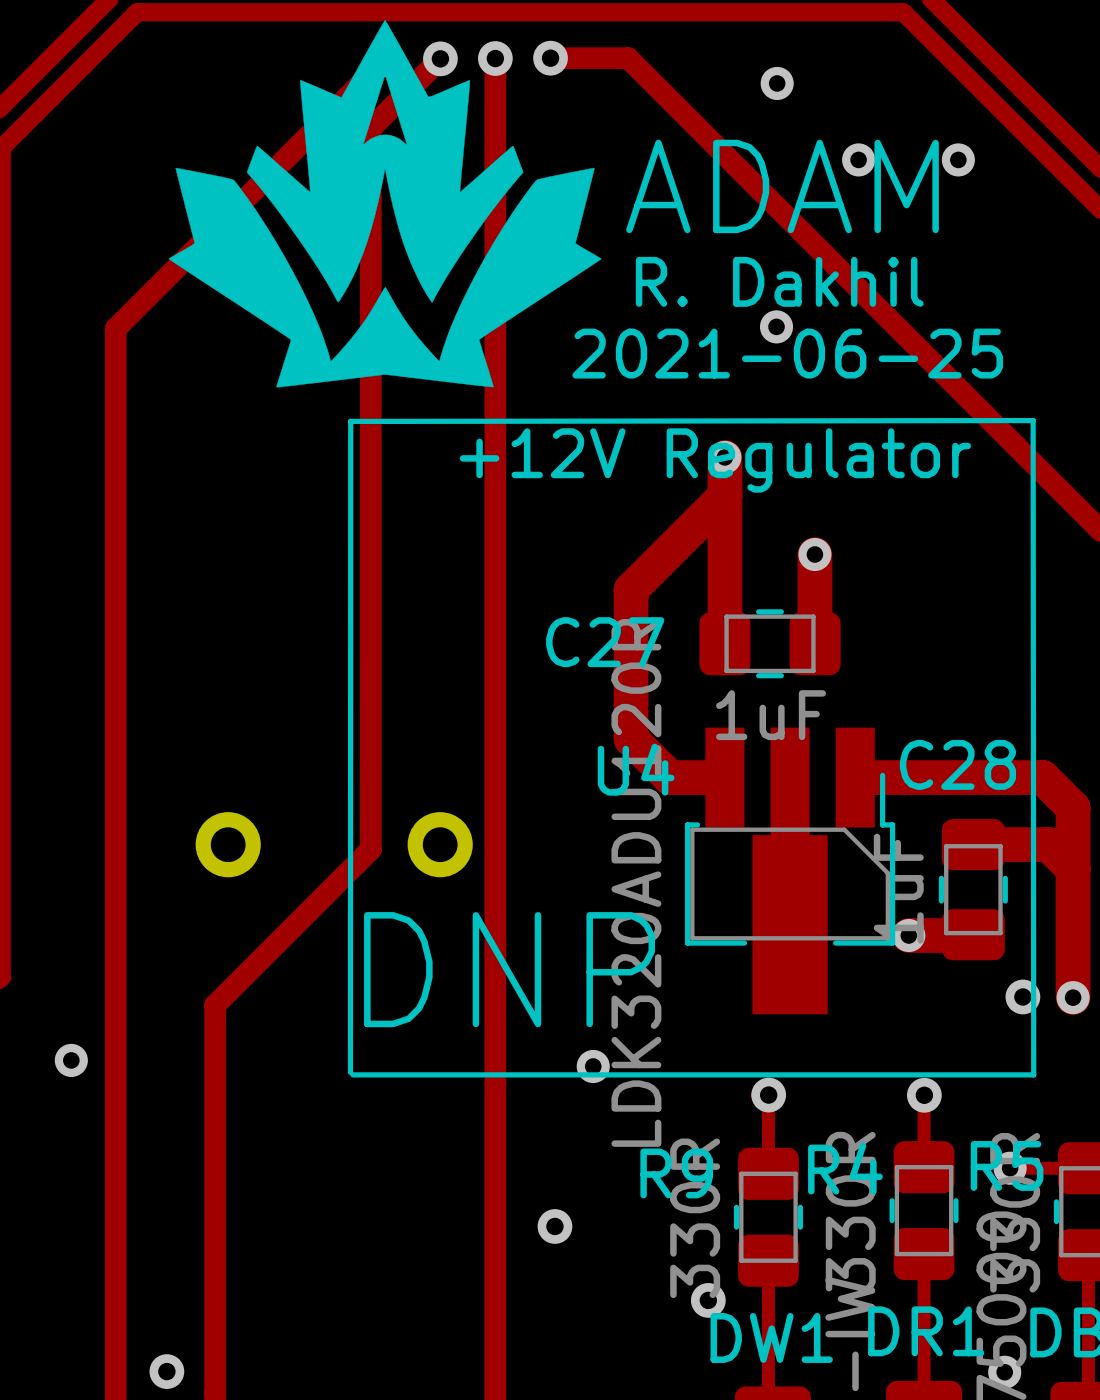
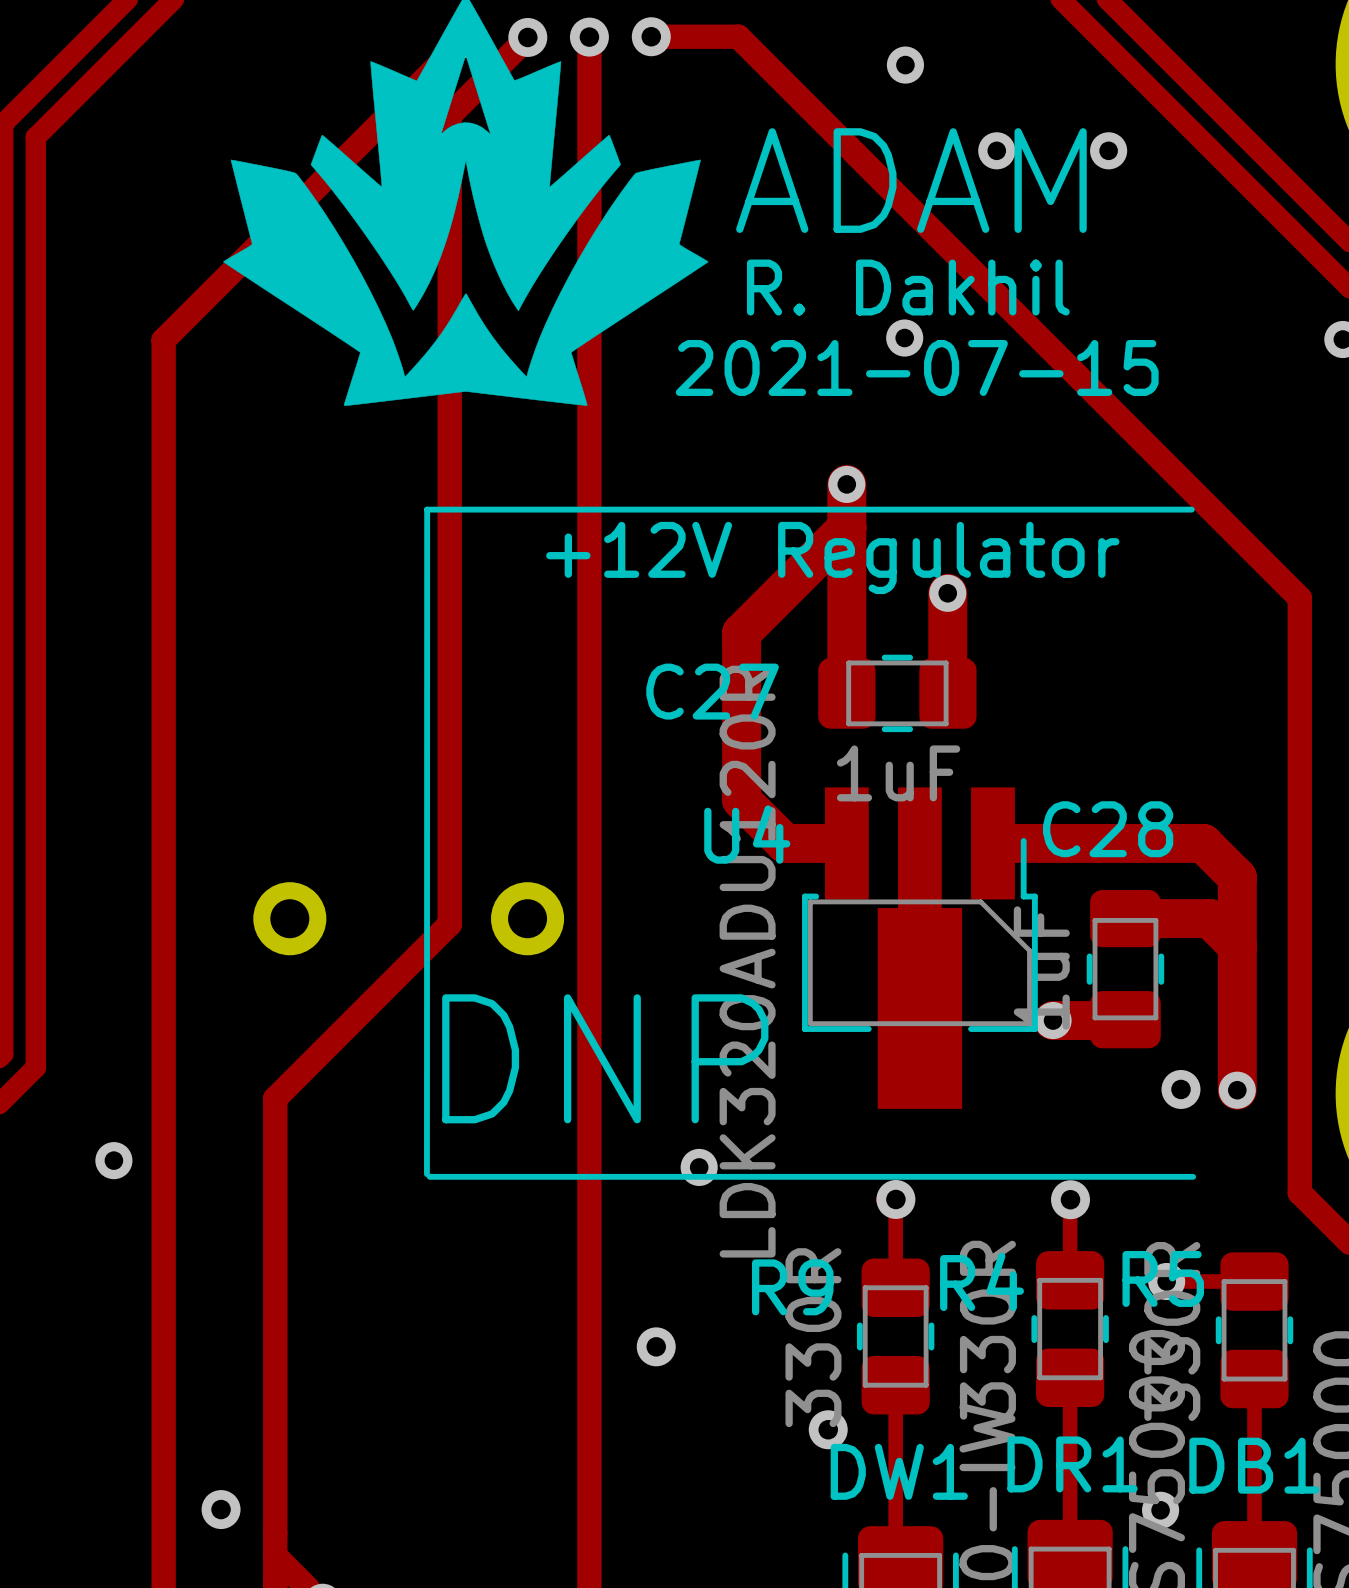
text: 2021-06-25 (787, 353) -> 2021-07-15 (917, 367)
text position: +12V Regulator (715, 460) -> +12V Regulator (832, 557)
line: (350, 479) (350, 421) (1033, 420) (1033, 1074) -> (427, 509) (1191, 509)

